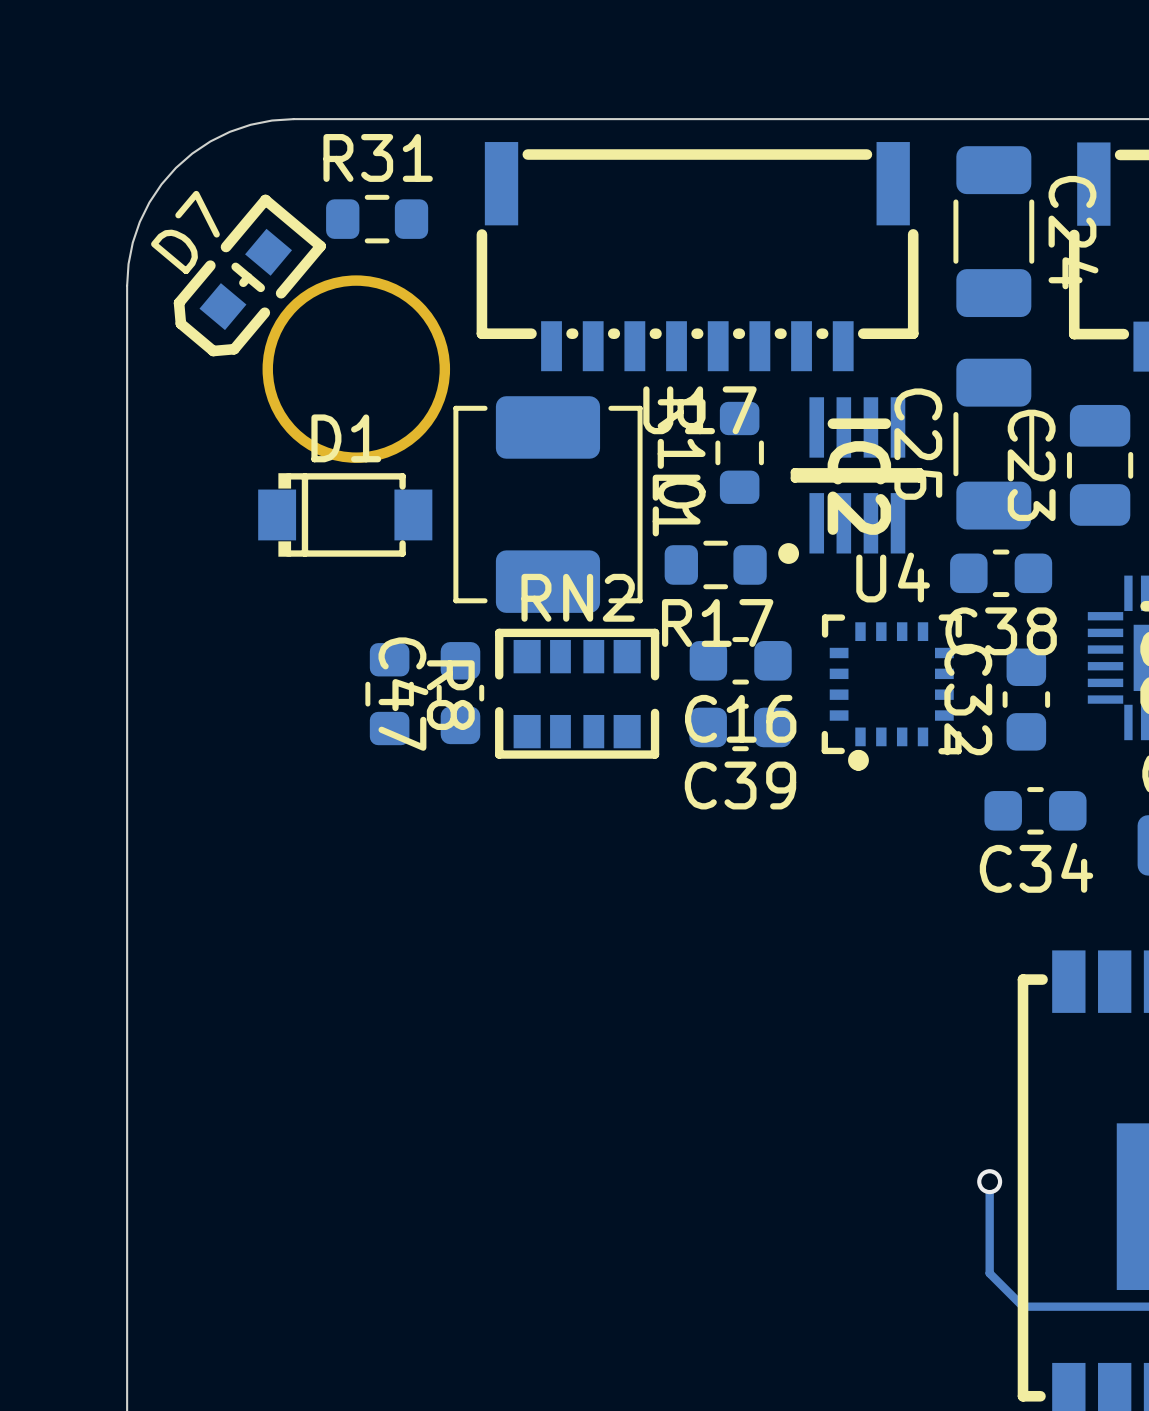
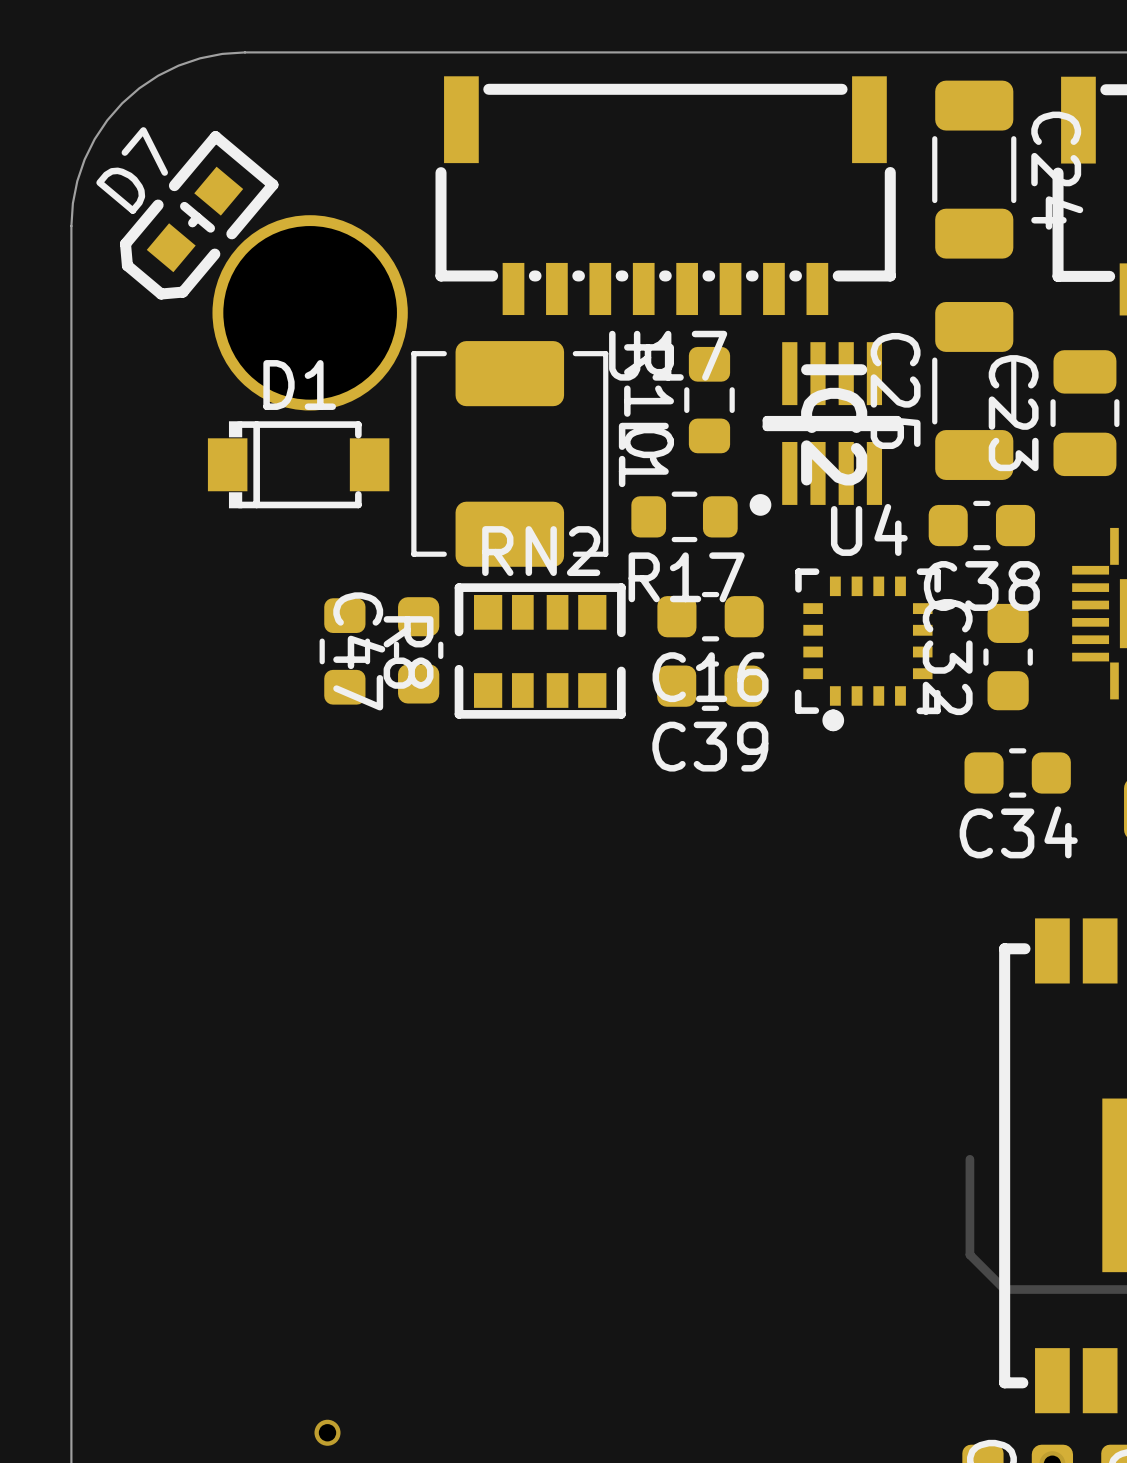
R31: (377, 219) -> none
via: (989, 1181) -> none

